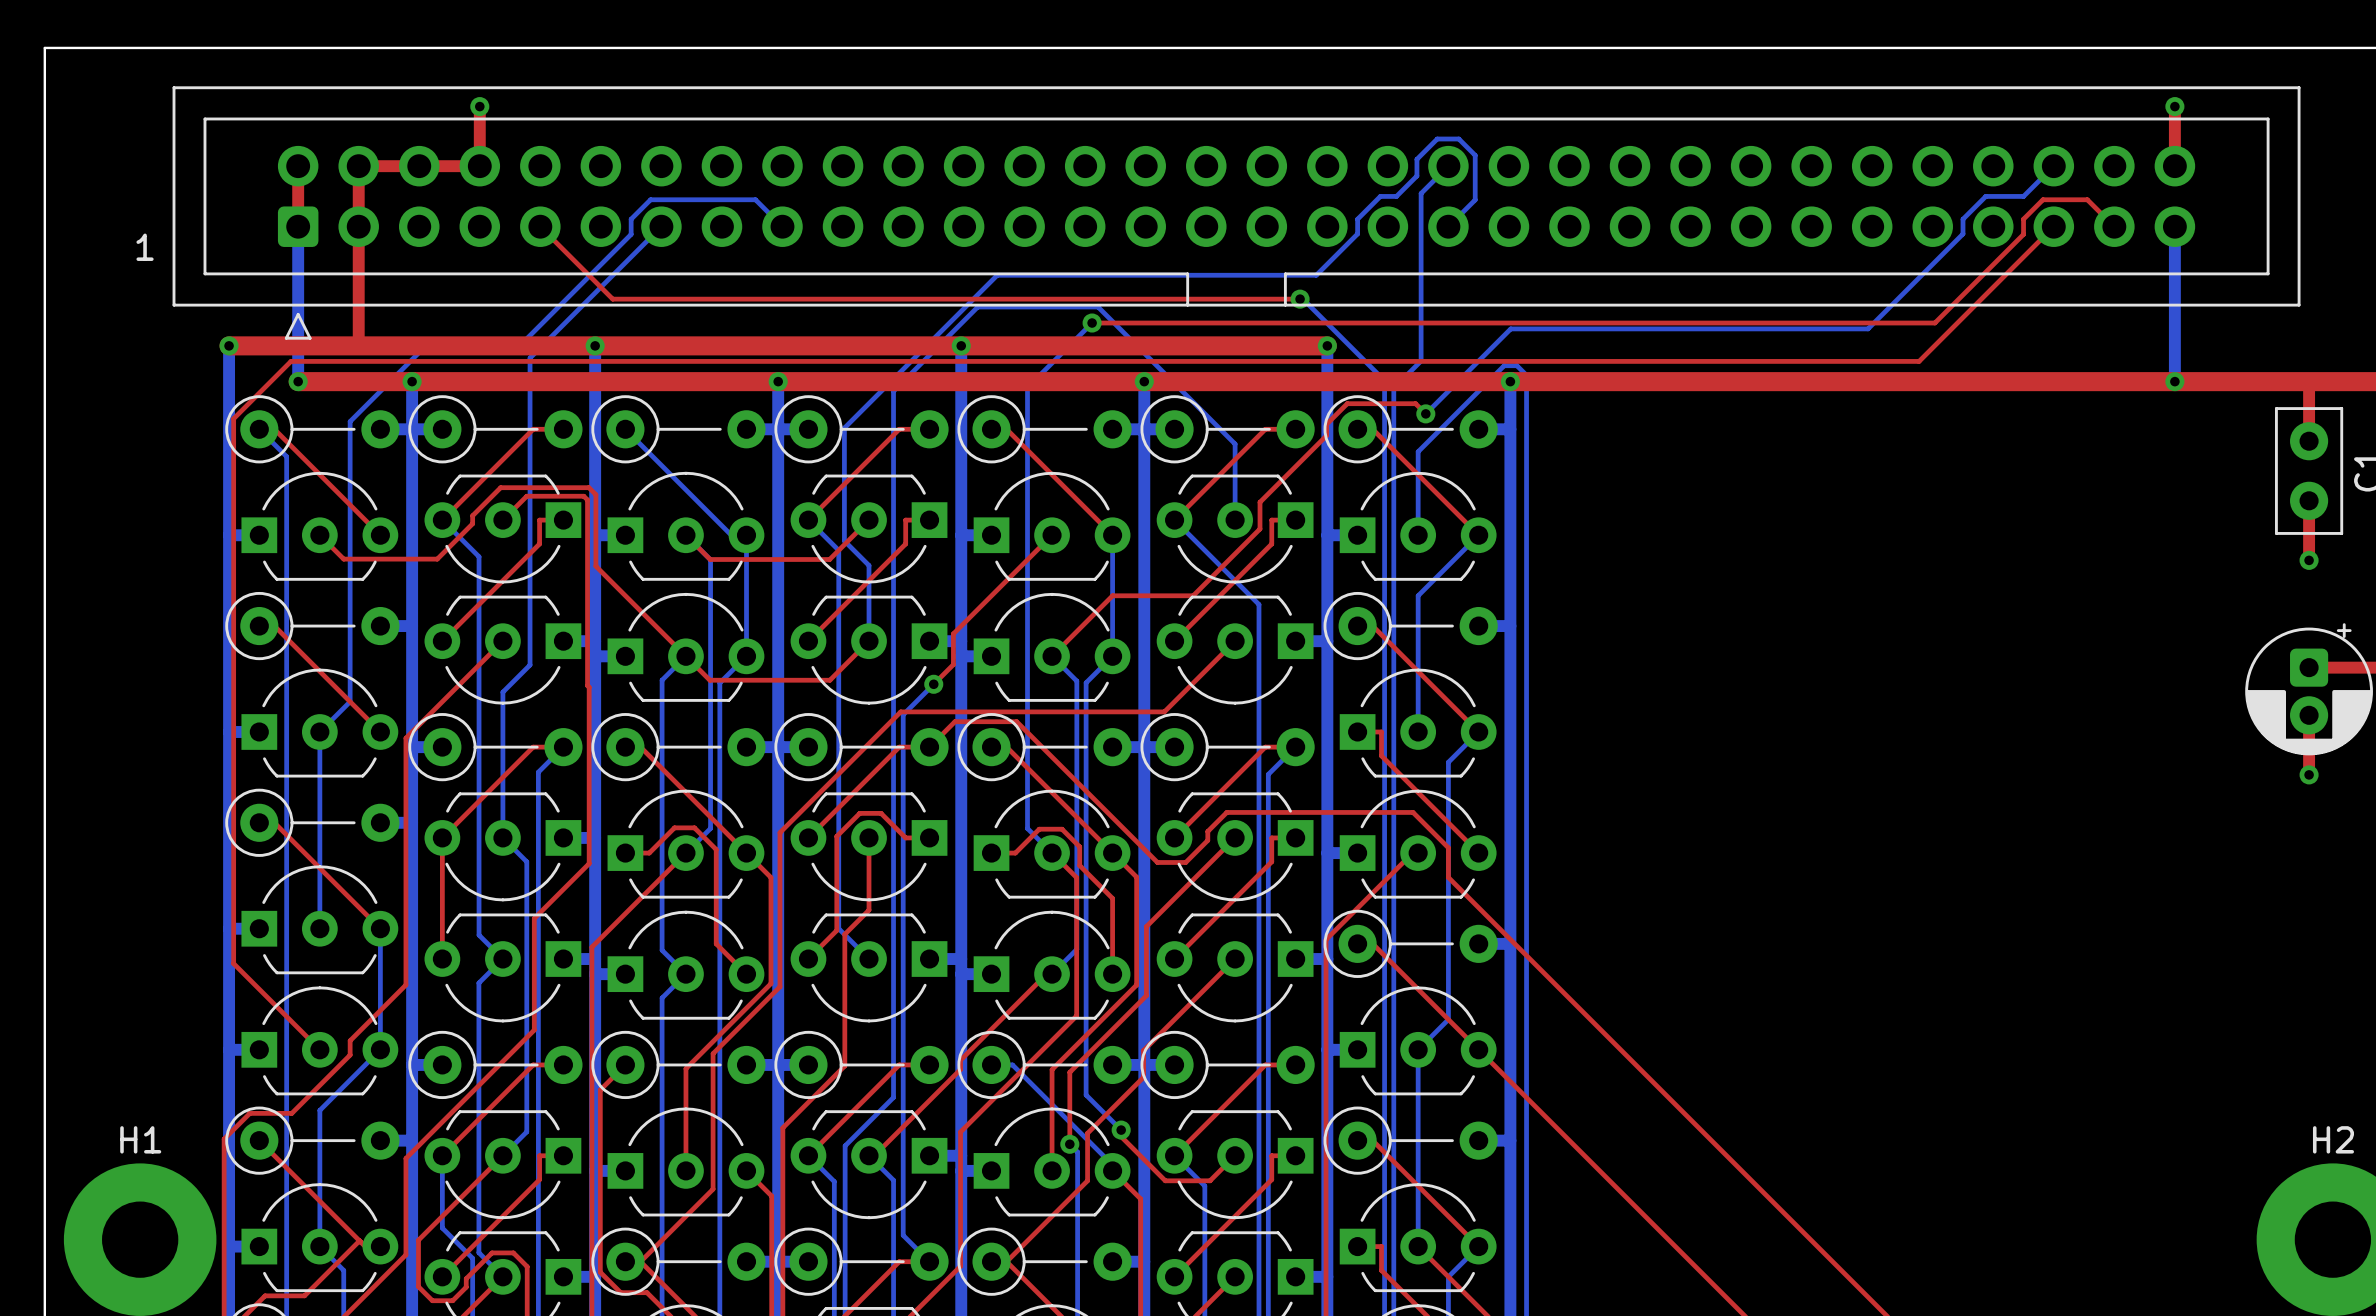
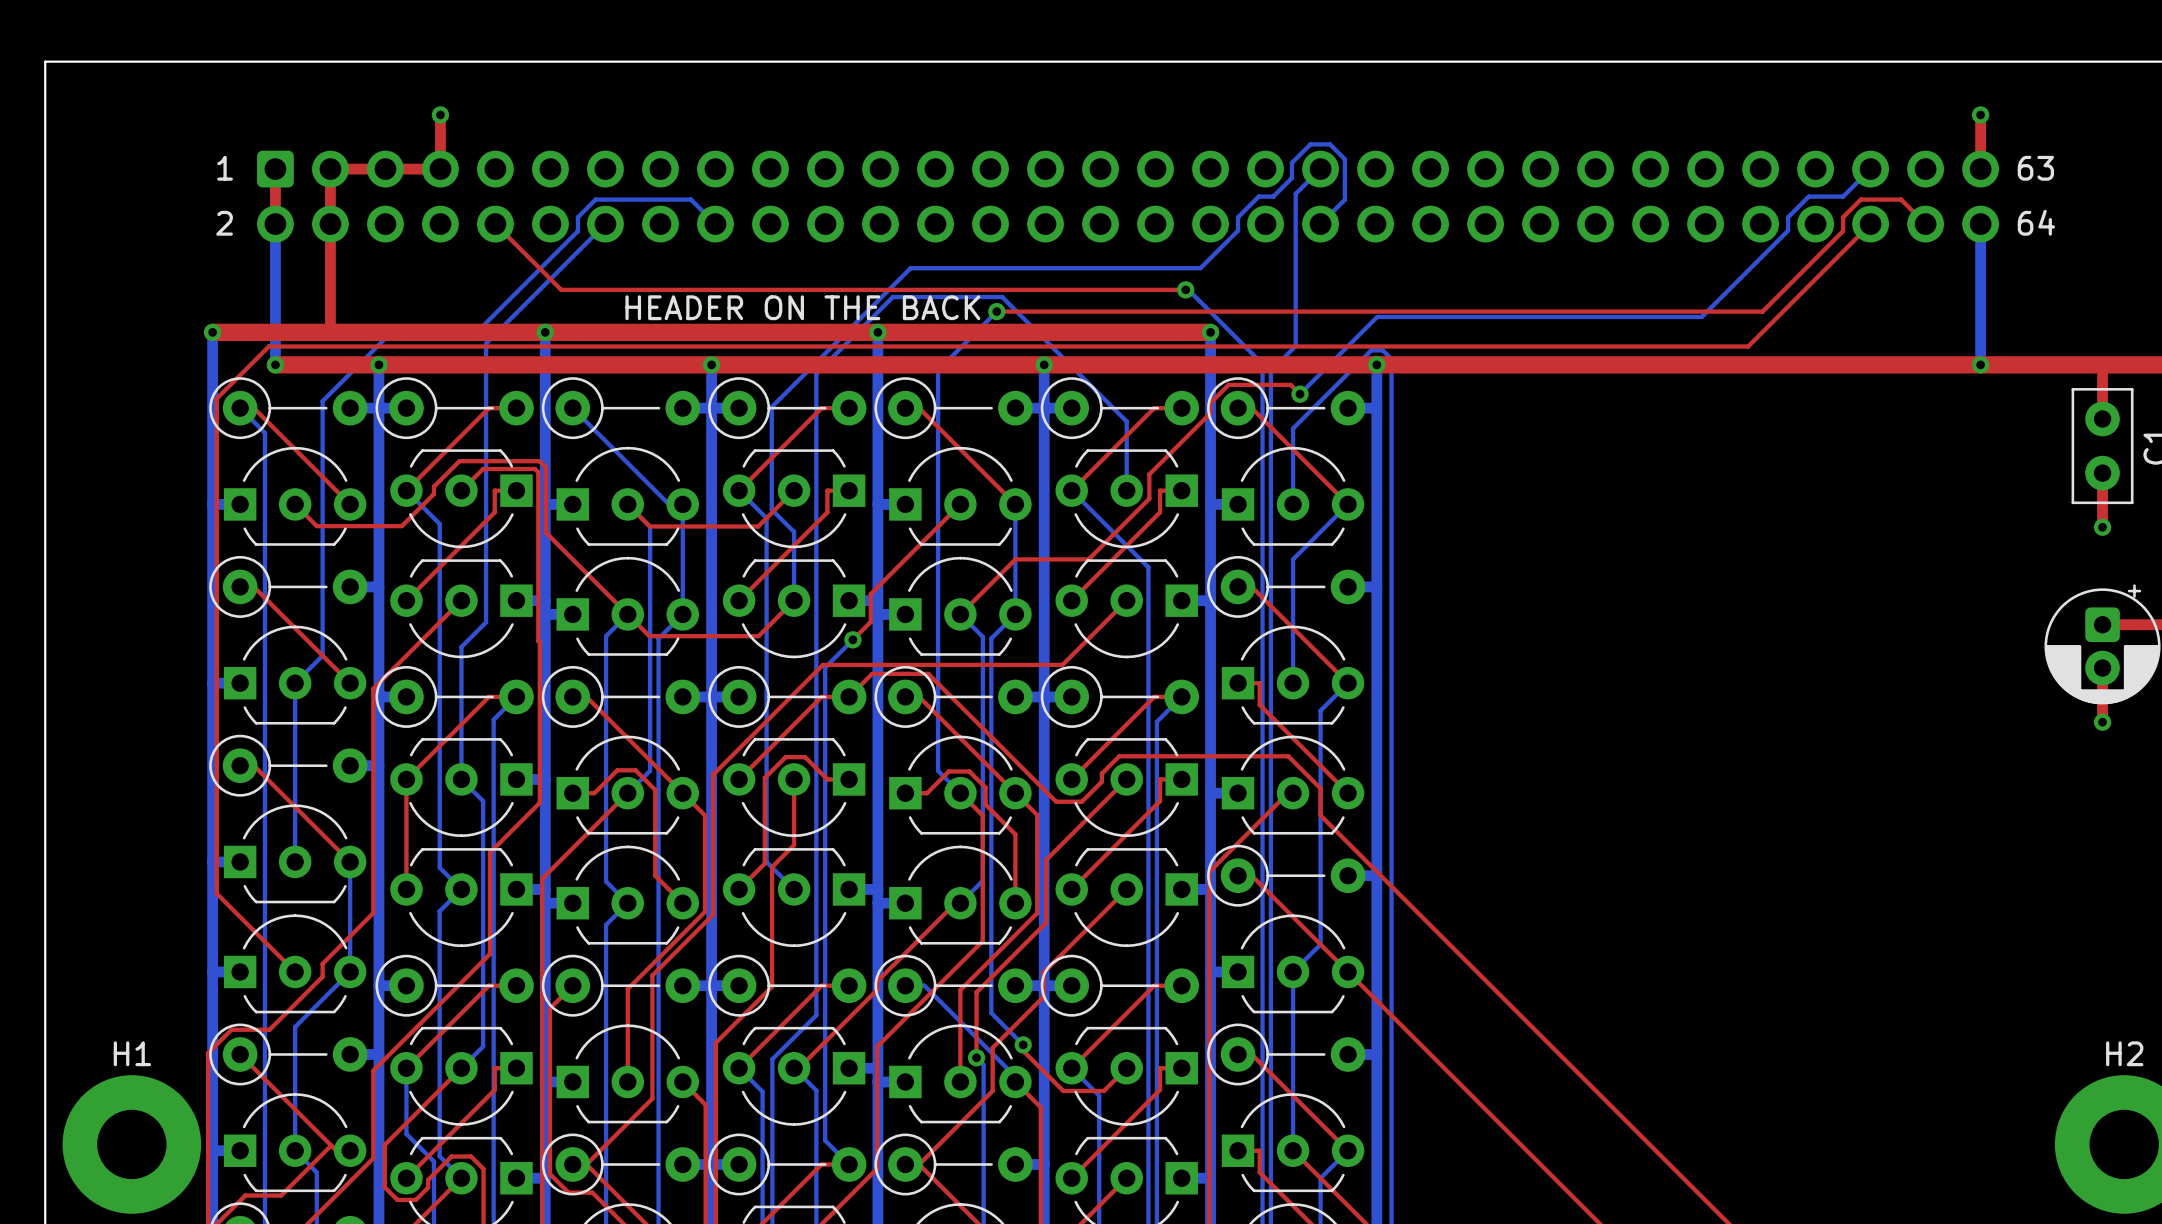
text: none -> 63 (2035, 168)
part side: top (1236, 213) -> bottom (1128, 196)
text: none -> 2 (224, 223)
text: none -> 64 (2036, 222)
text position: 1 (145, 247) -> 1 (225, 168)
text: none -> HEADER ON THE BACK (802, 307)

